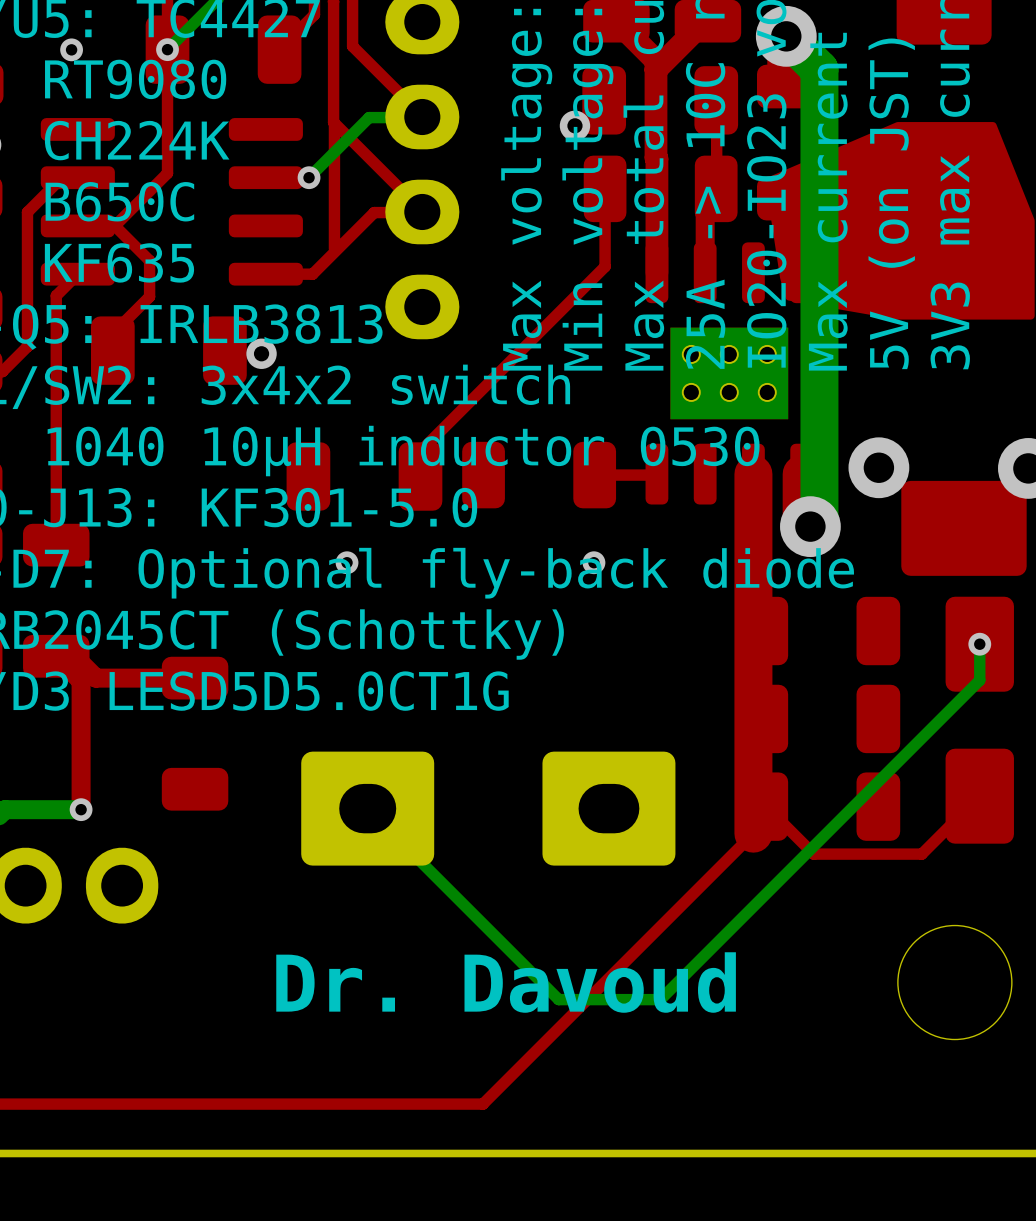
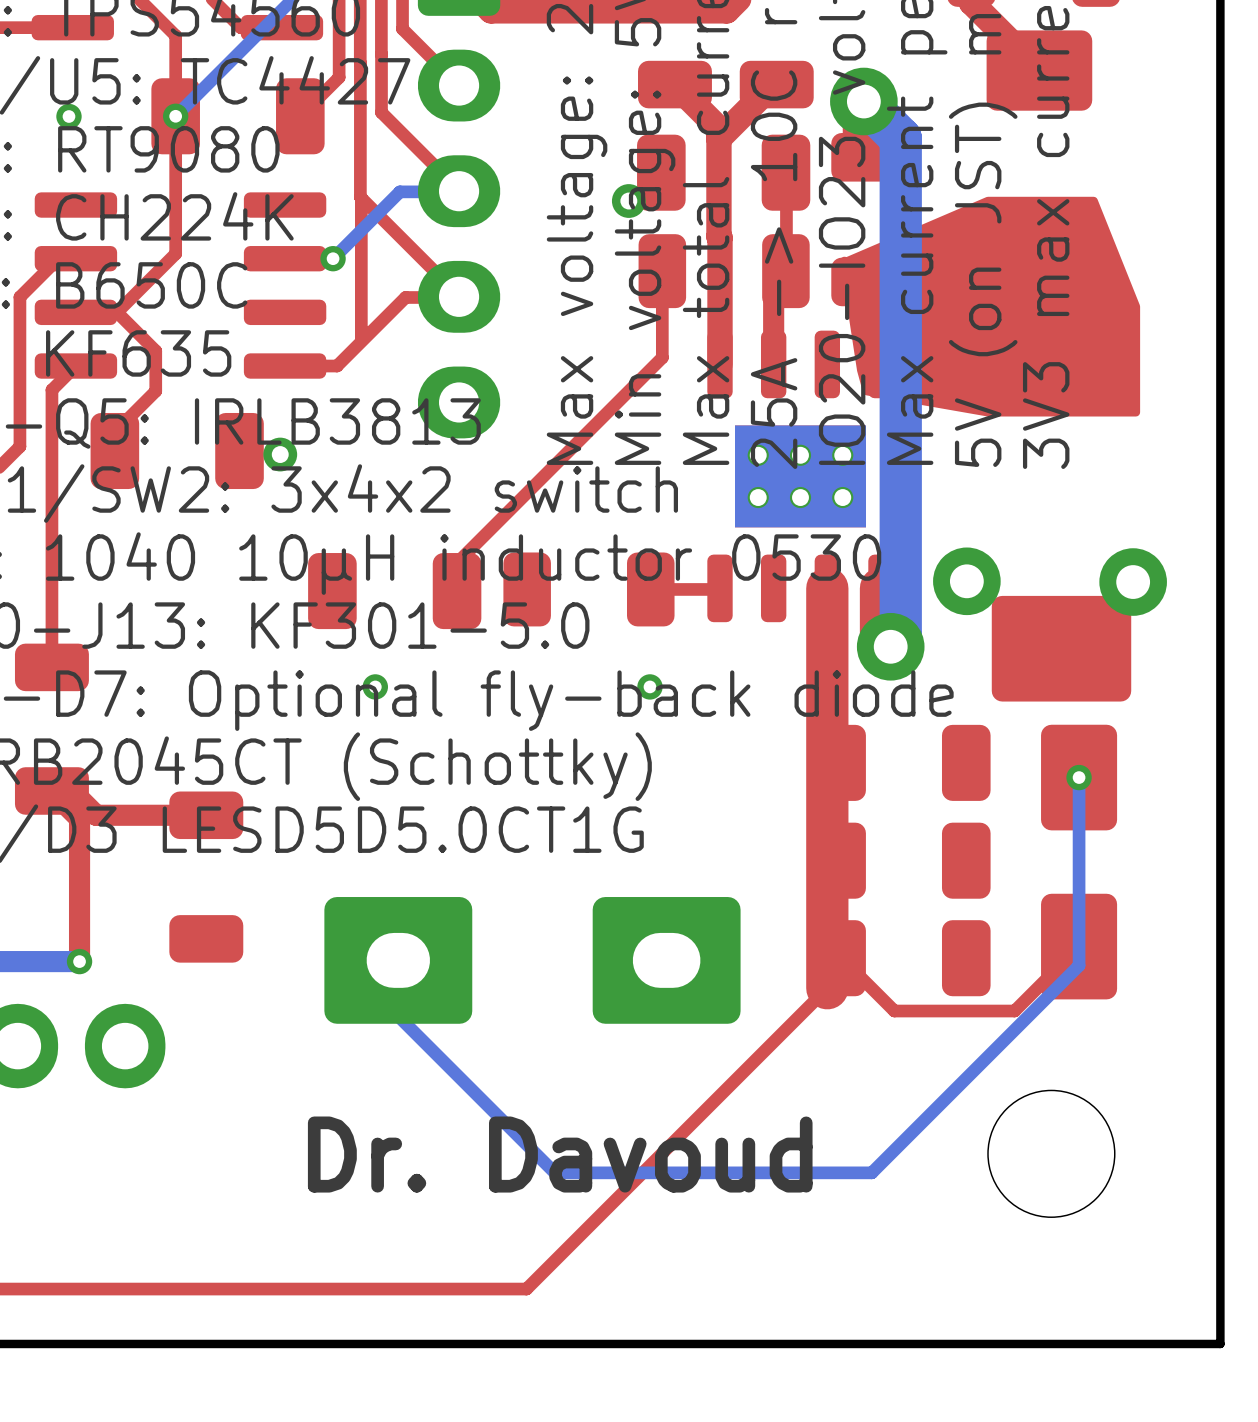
bottom track: (979, 680) (660, 999) -> (1079, 817) (1079, 965) (871, 1172) (723, 1172)
bottom track: (367, 808) (558, 999) -> (398, 960) (398, 1016) (554, 1172) (610, 1172)

